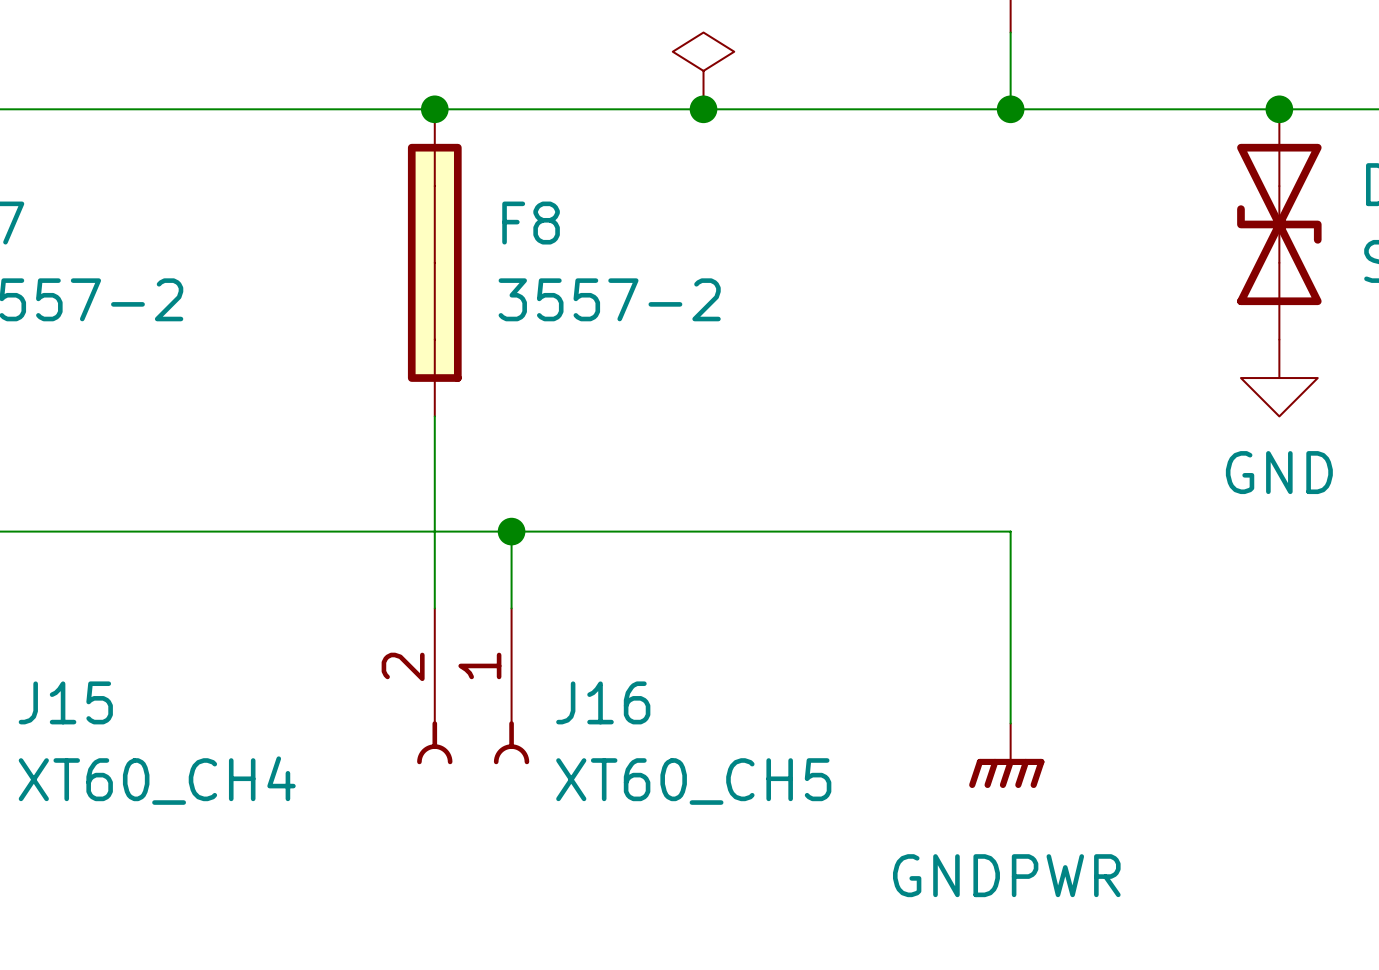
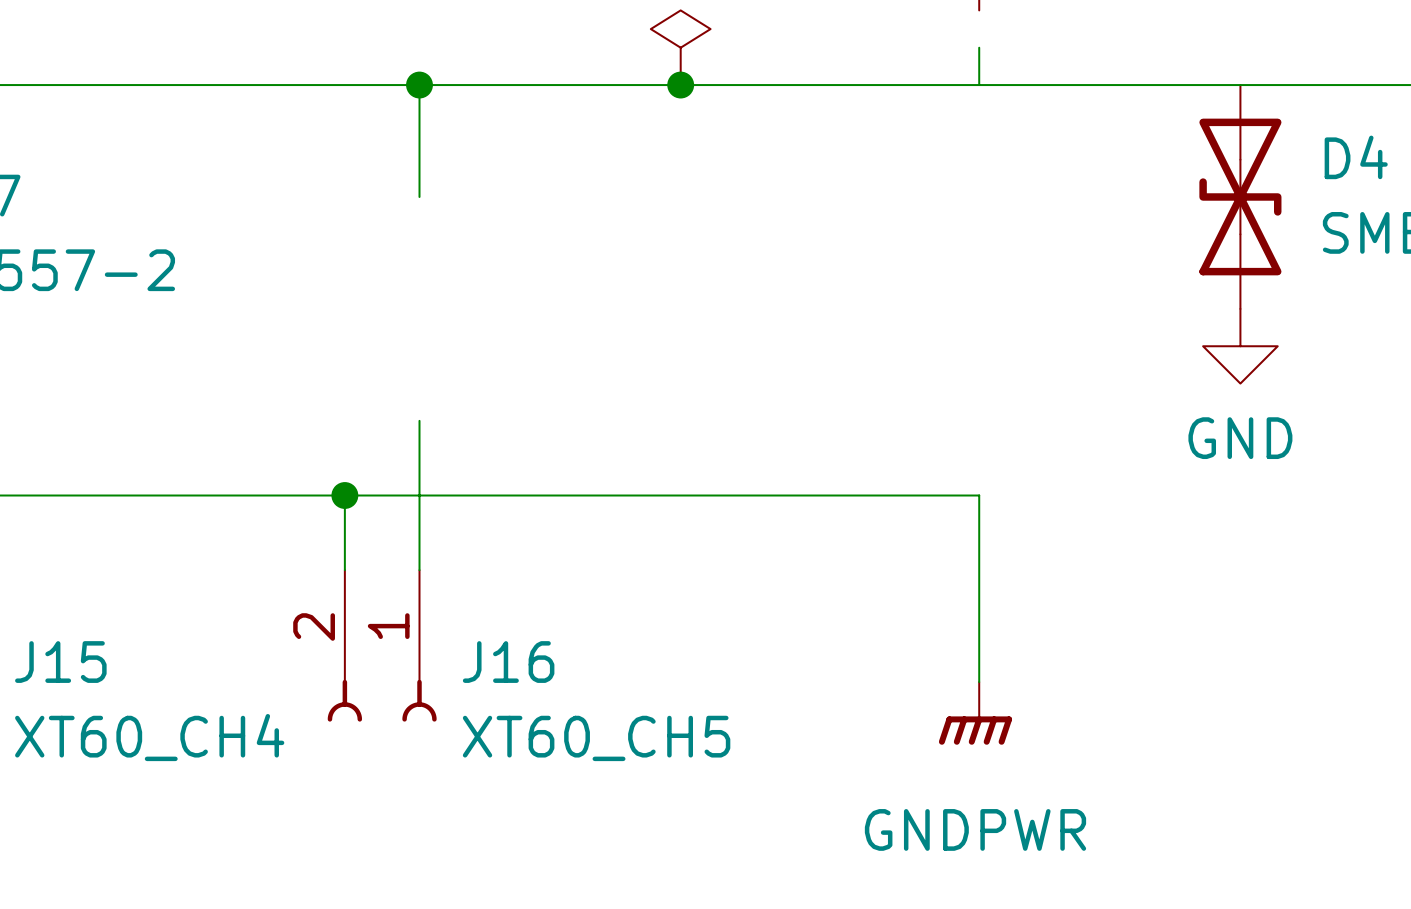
wire: (1010, 32) (1010, 70) -> none
junction: (1010, 109) -> none
junction: (1279, 109) -> none
F8: 3557-2 (434, 262) -> none
wire: (434, 416) (434, 454) -> none
wire: (511, 531) (511, 608) -> (344, 495) (344, 570)
junction position: (511, 531) -> (344, 495)
J16 position: (473, 686) -> (382, 645)

